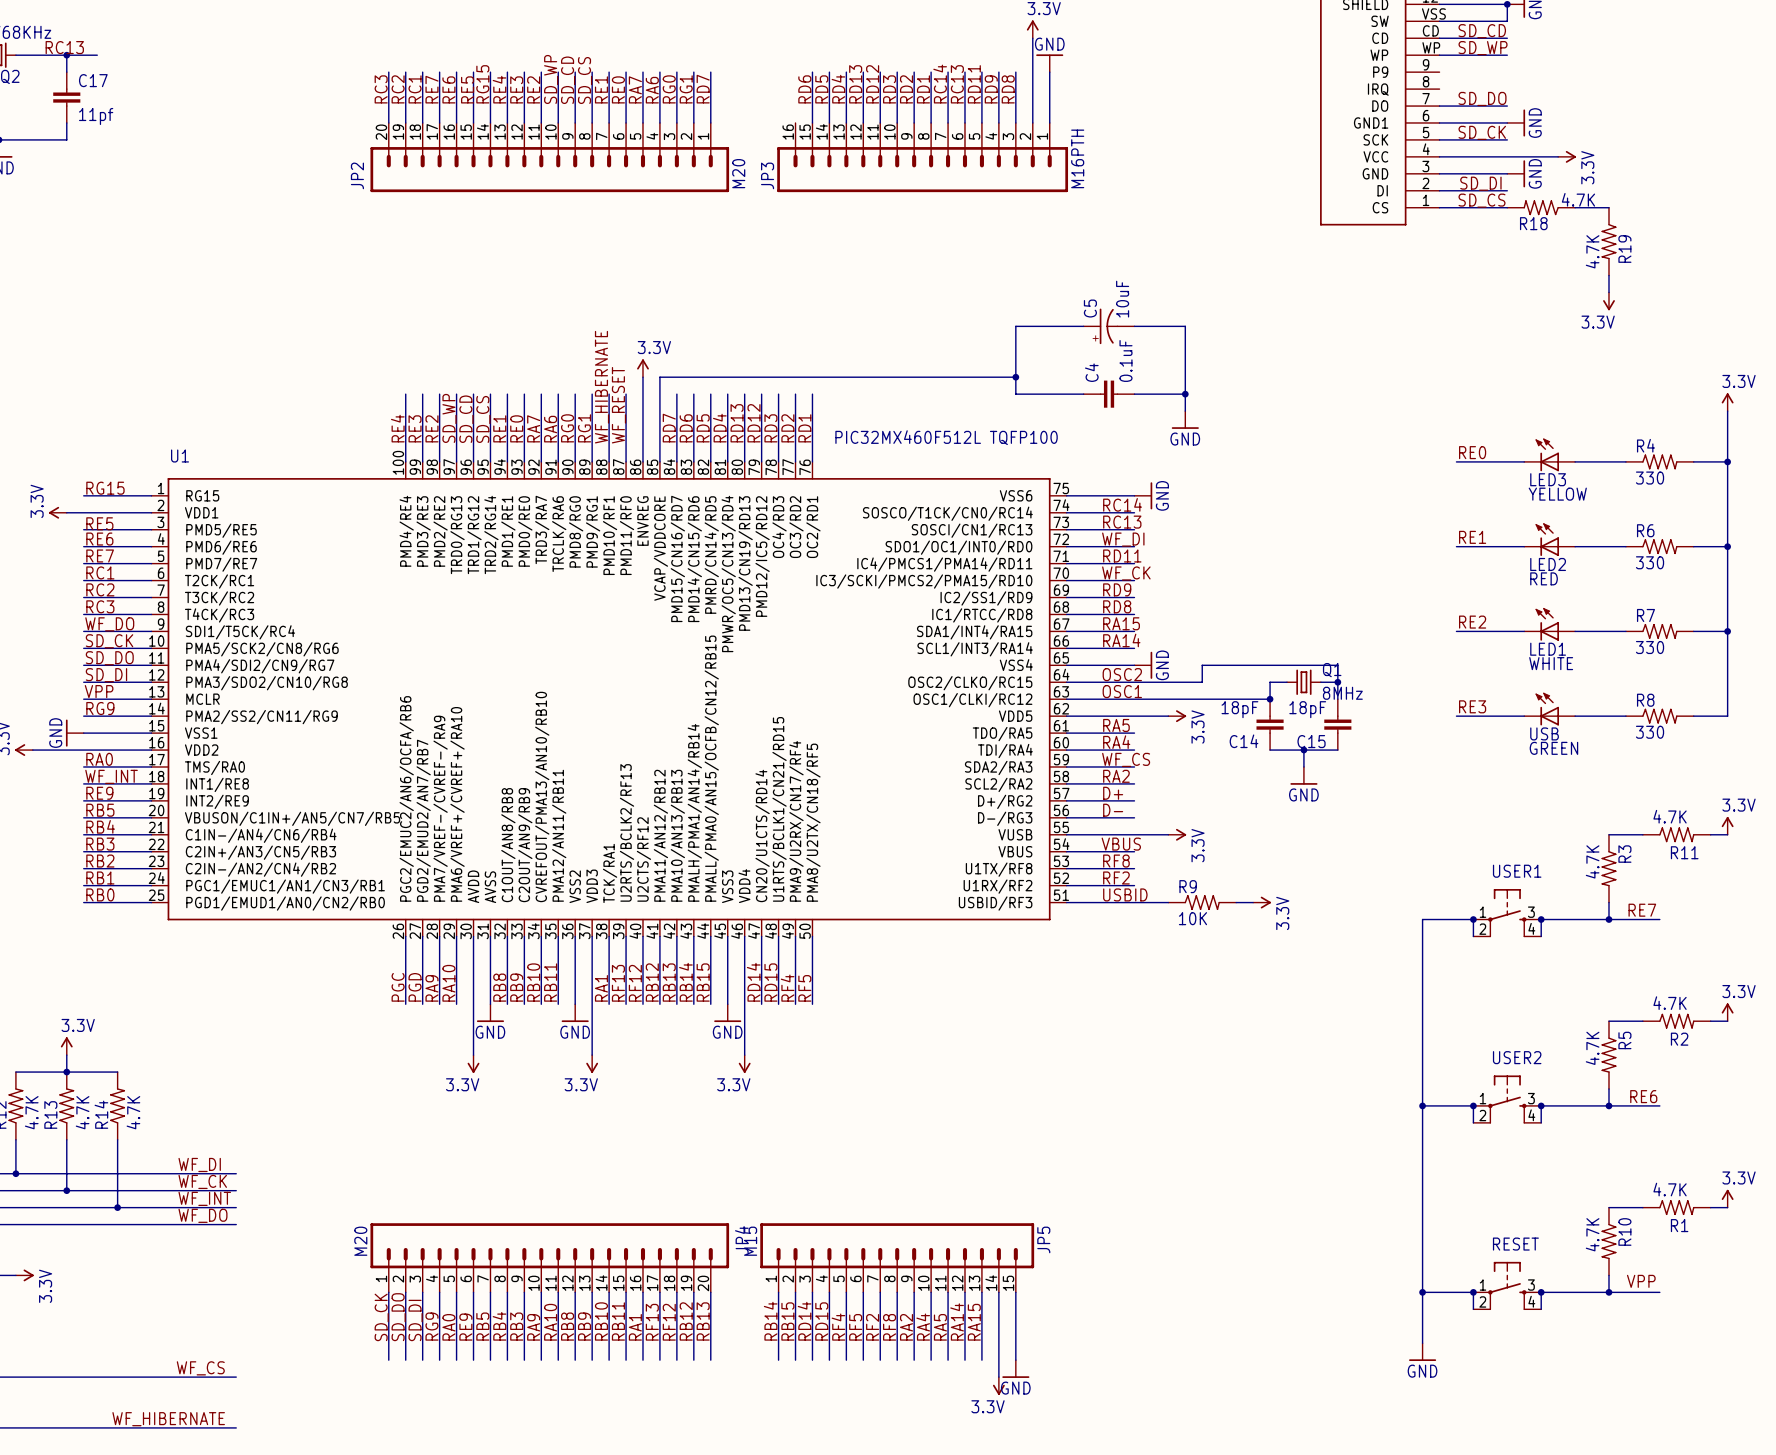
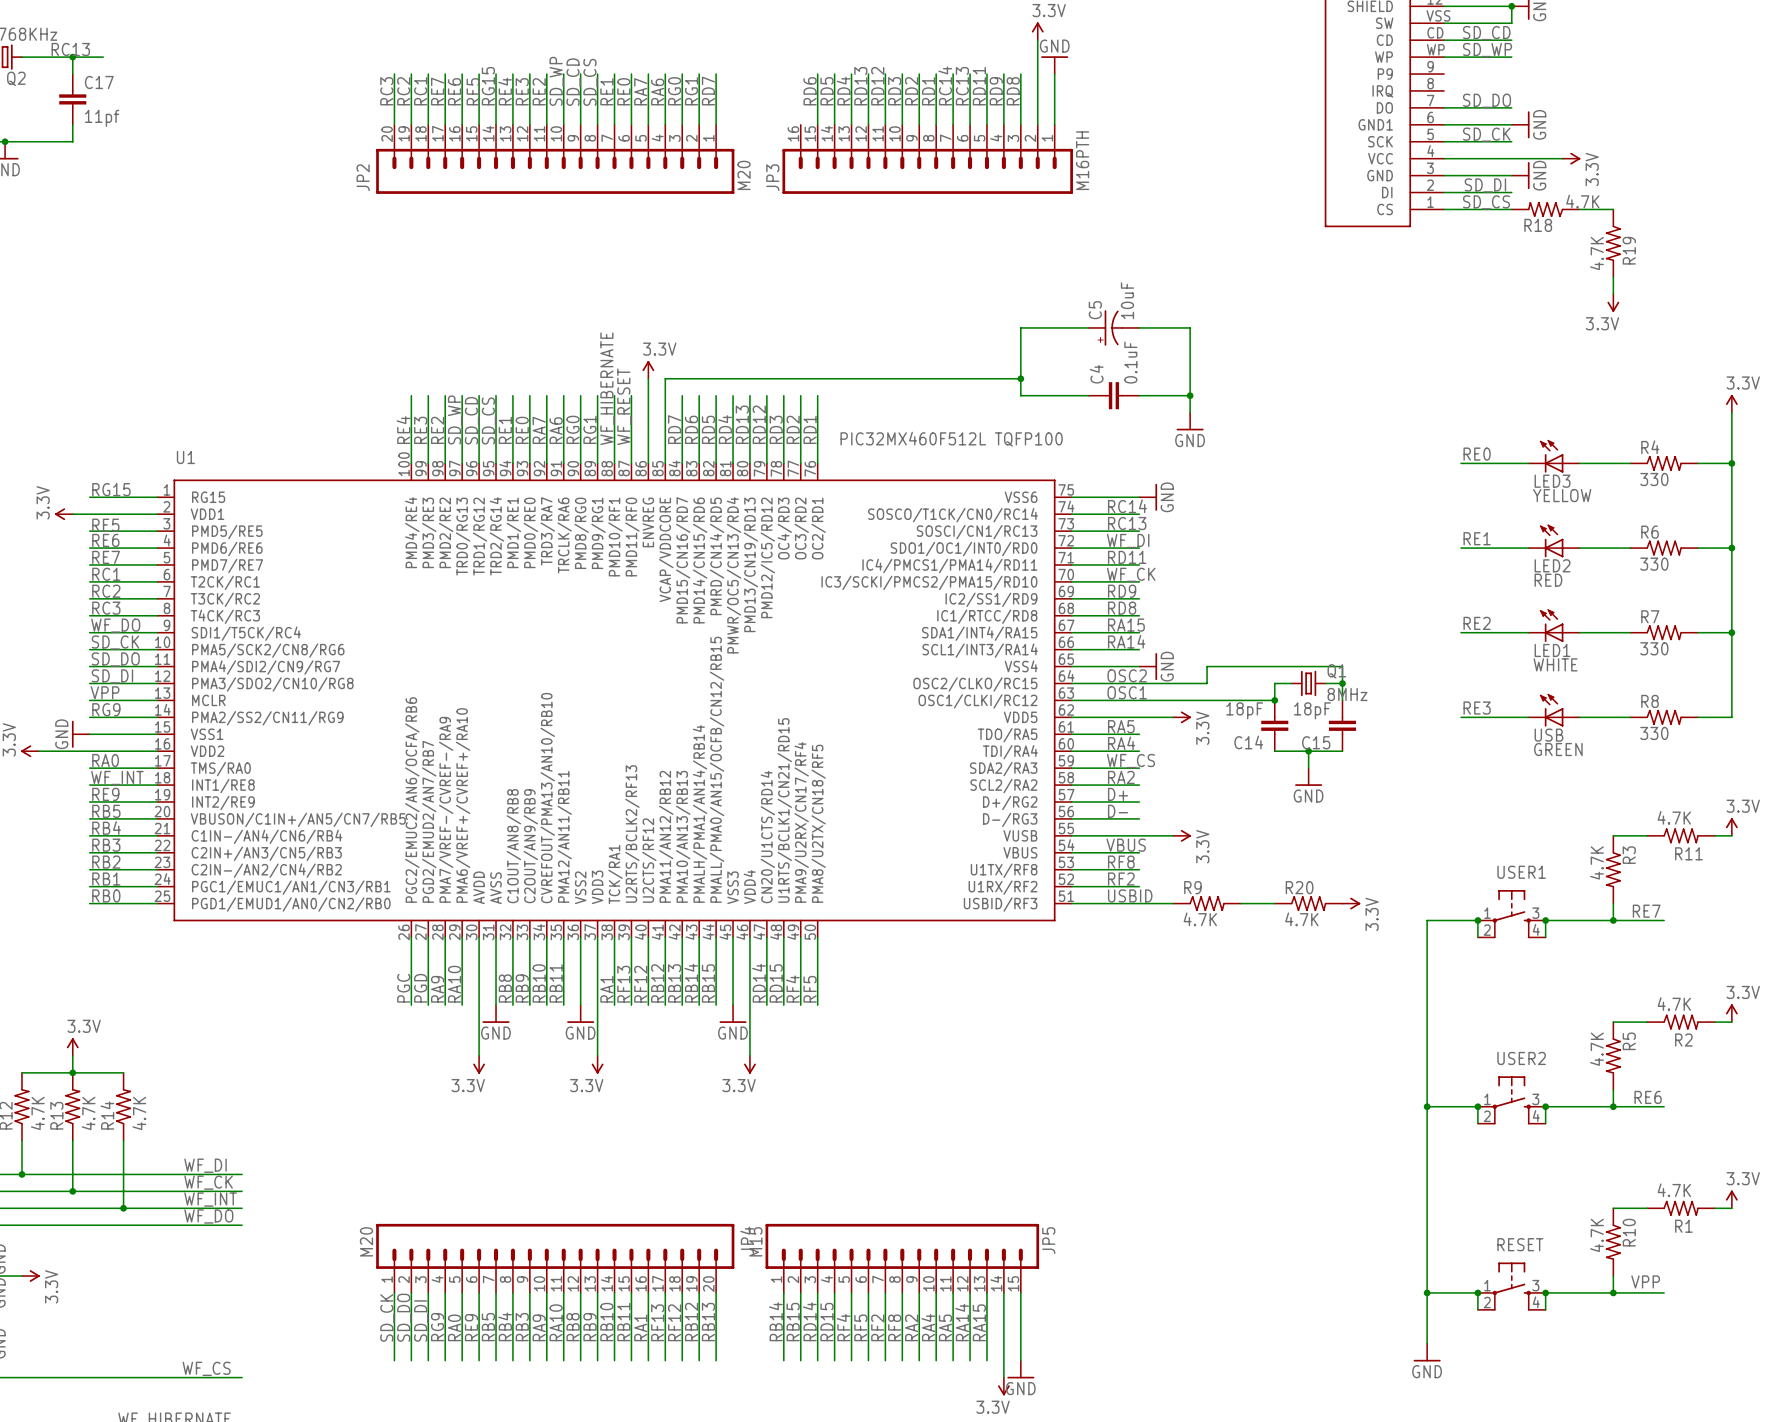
power symbol position: 3.3V (1261, 902) -> 3.3V (1351, 903)
R20: none -> 4.7K (1308, 903)
R9 value: 10K (1192, 918) -> 4.7K (1200, 919)

